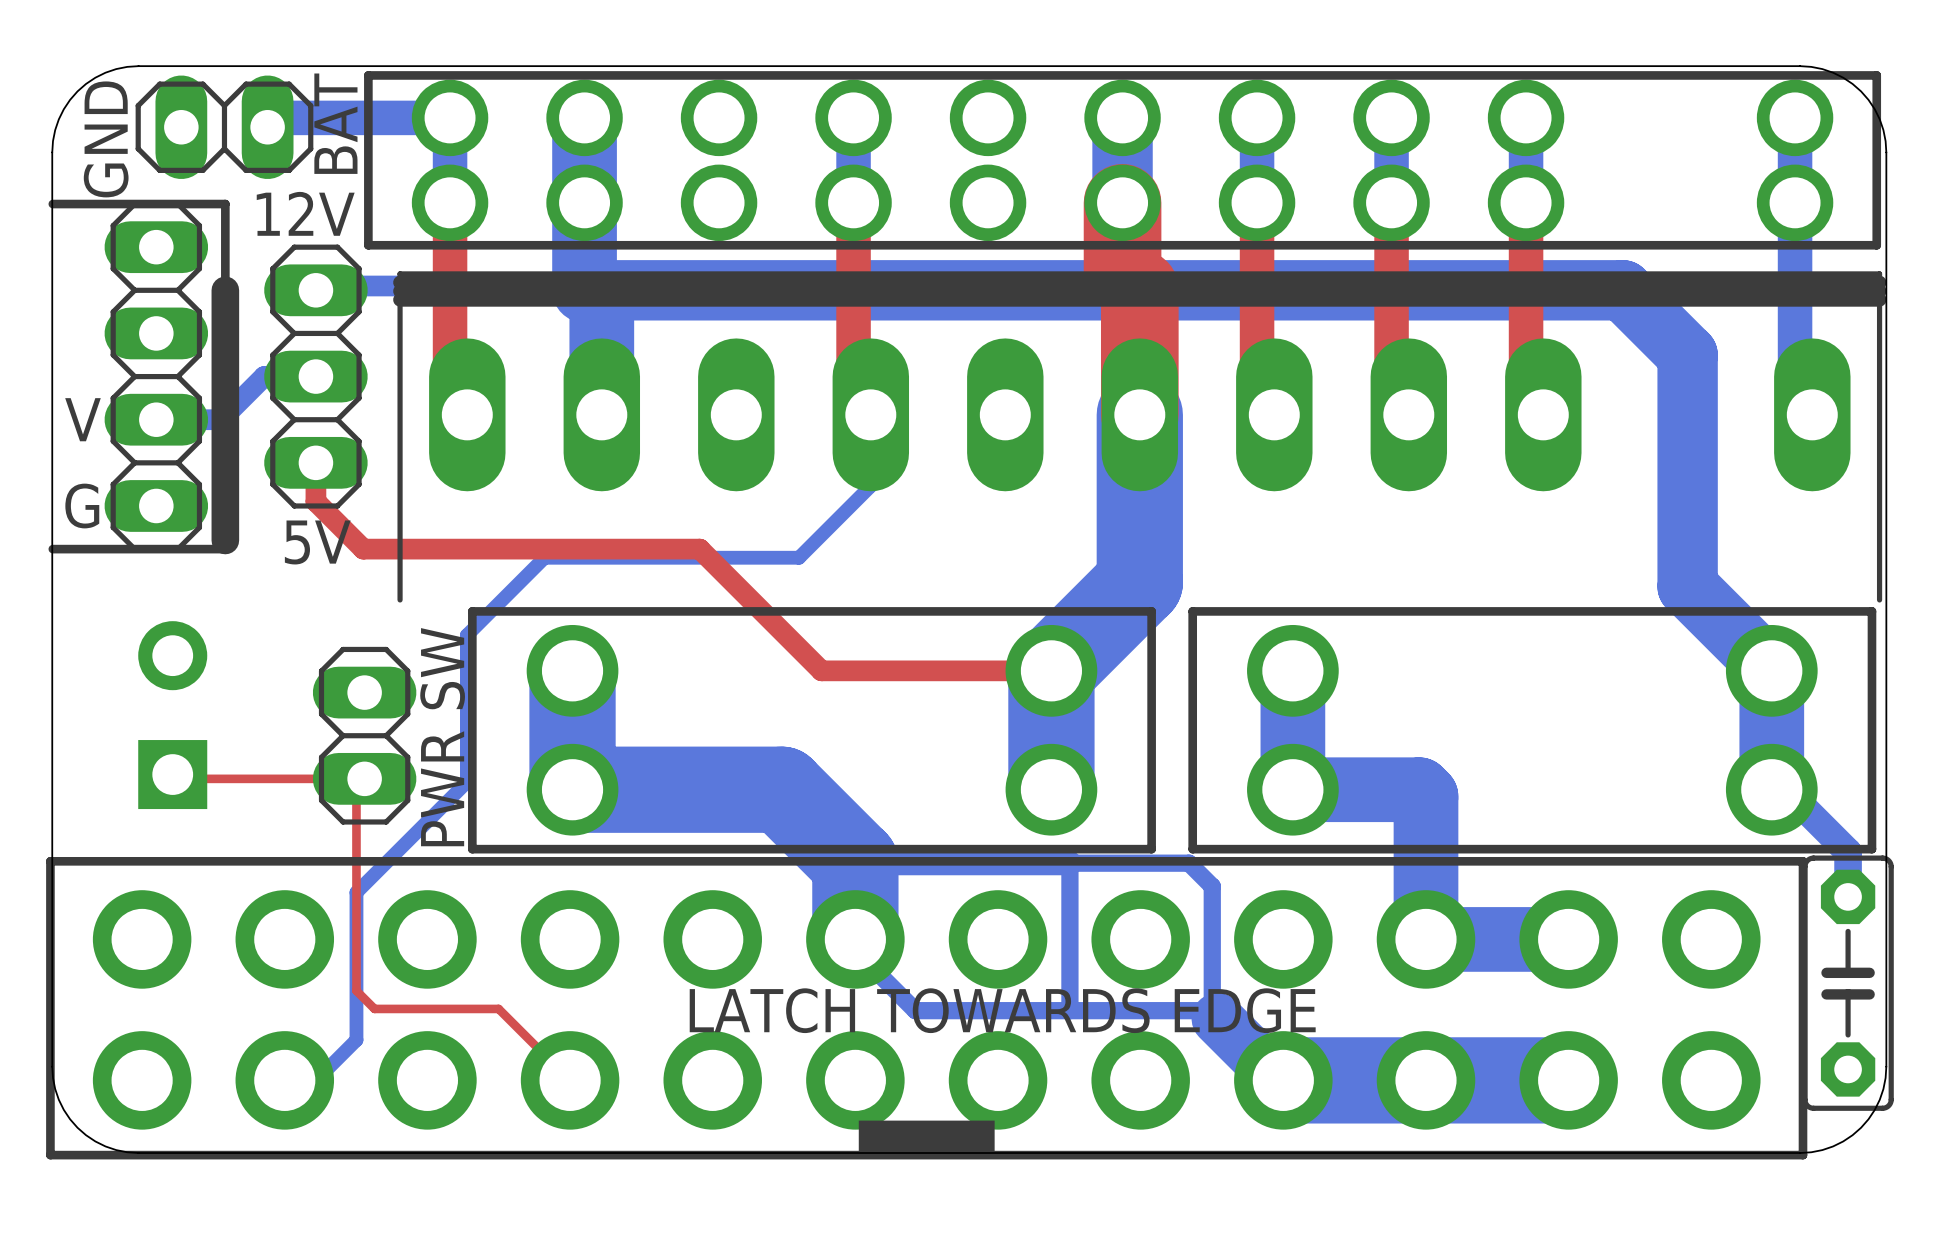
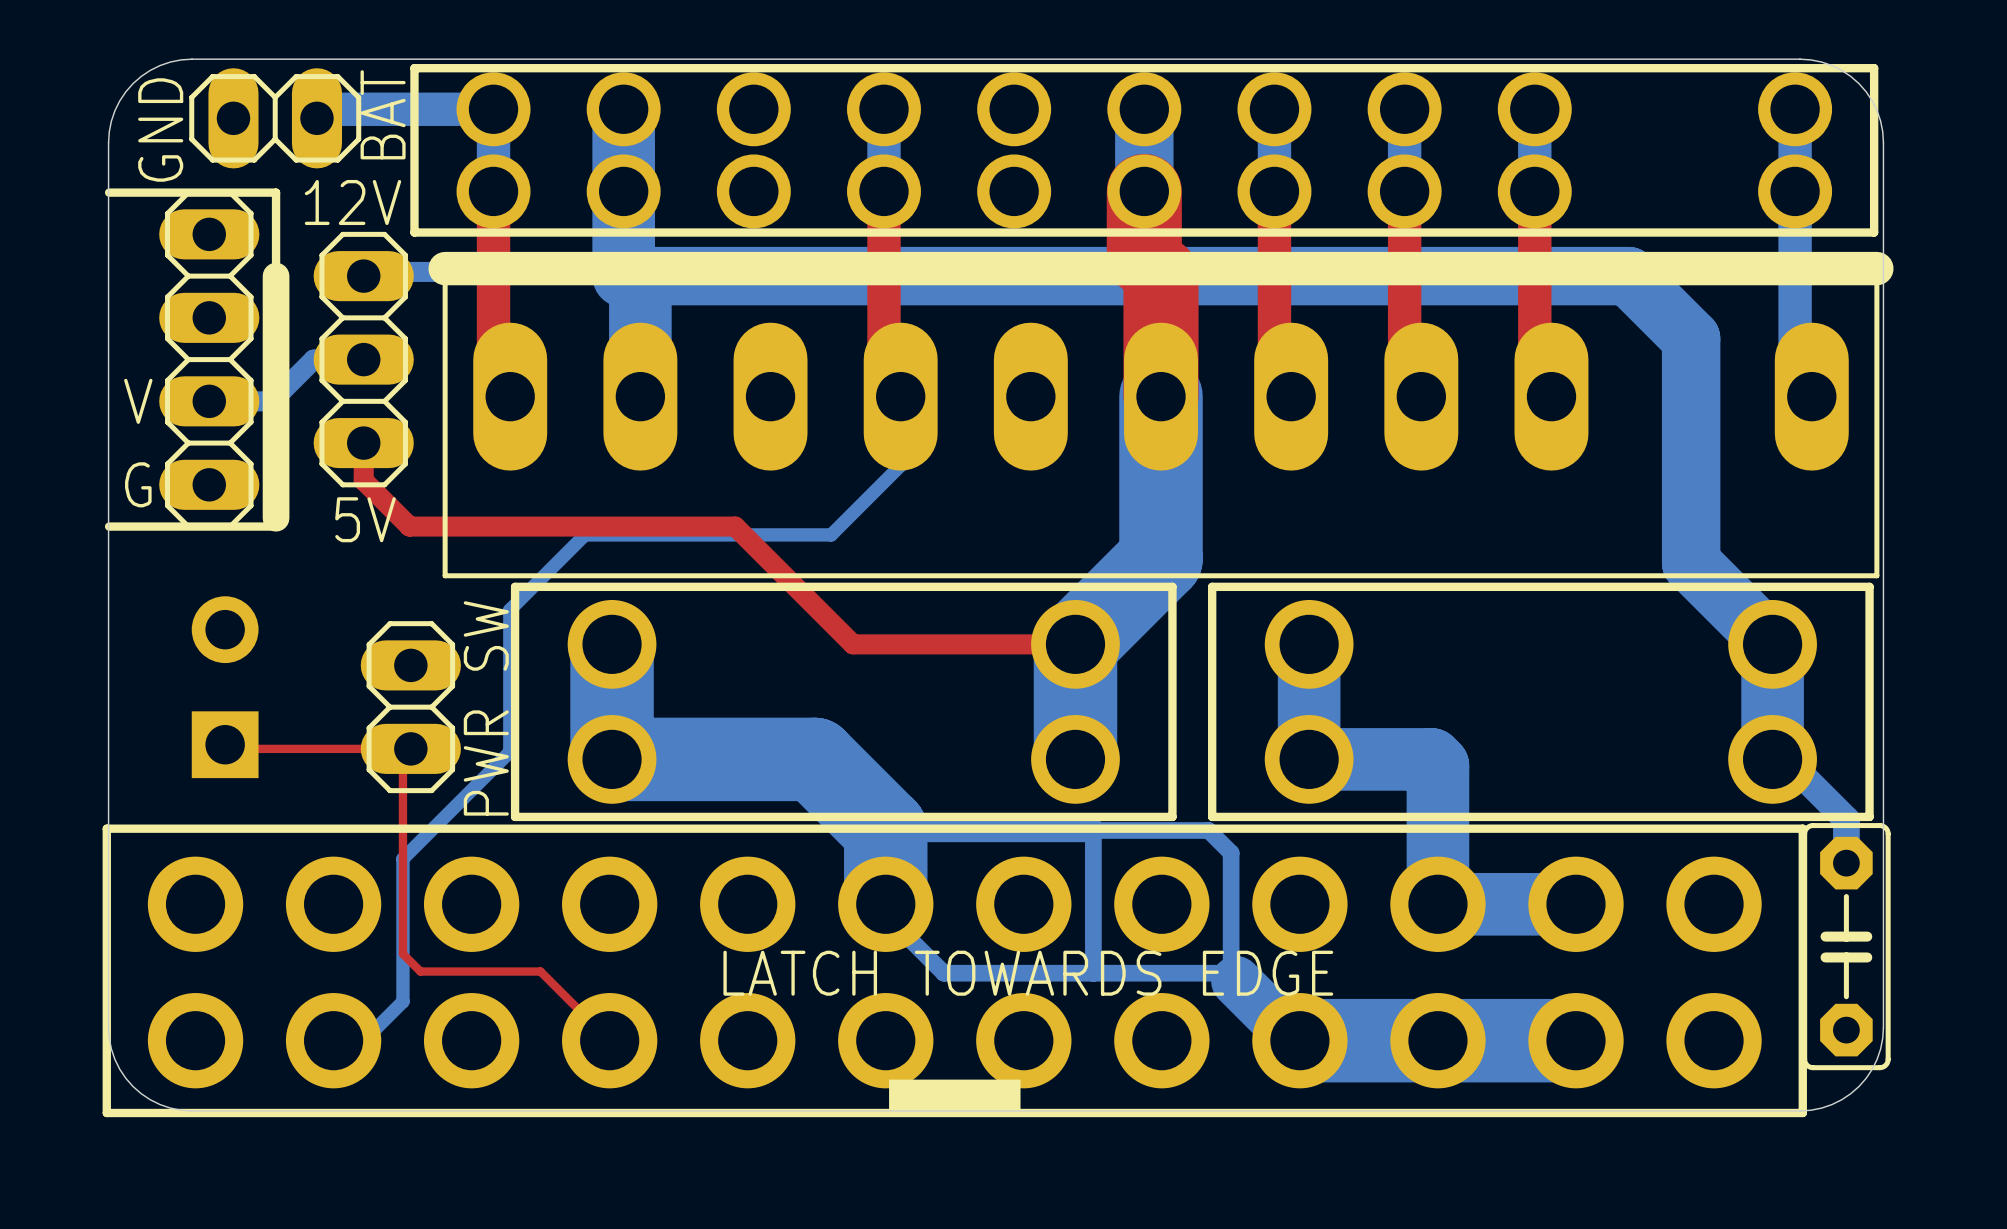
part footprint: [393, 271, 1887, 603] -> [428, 251, 1894, 579]

